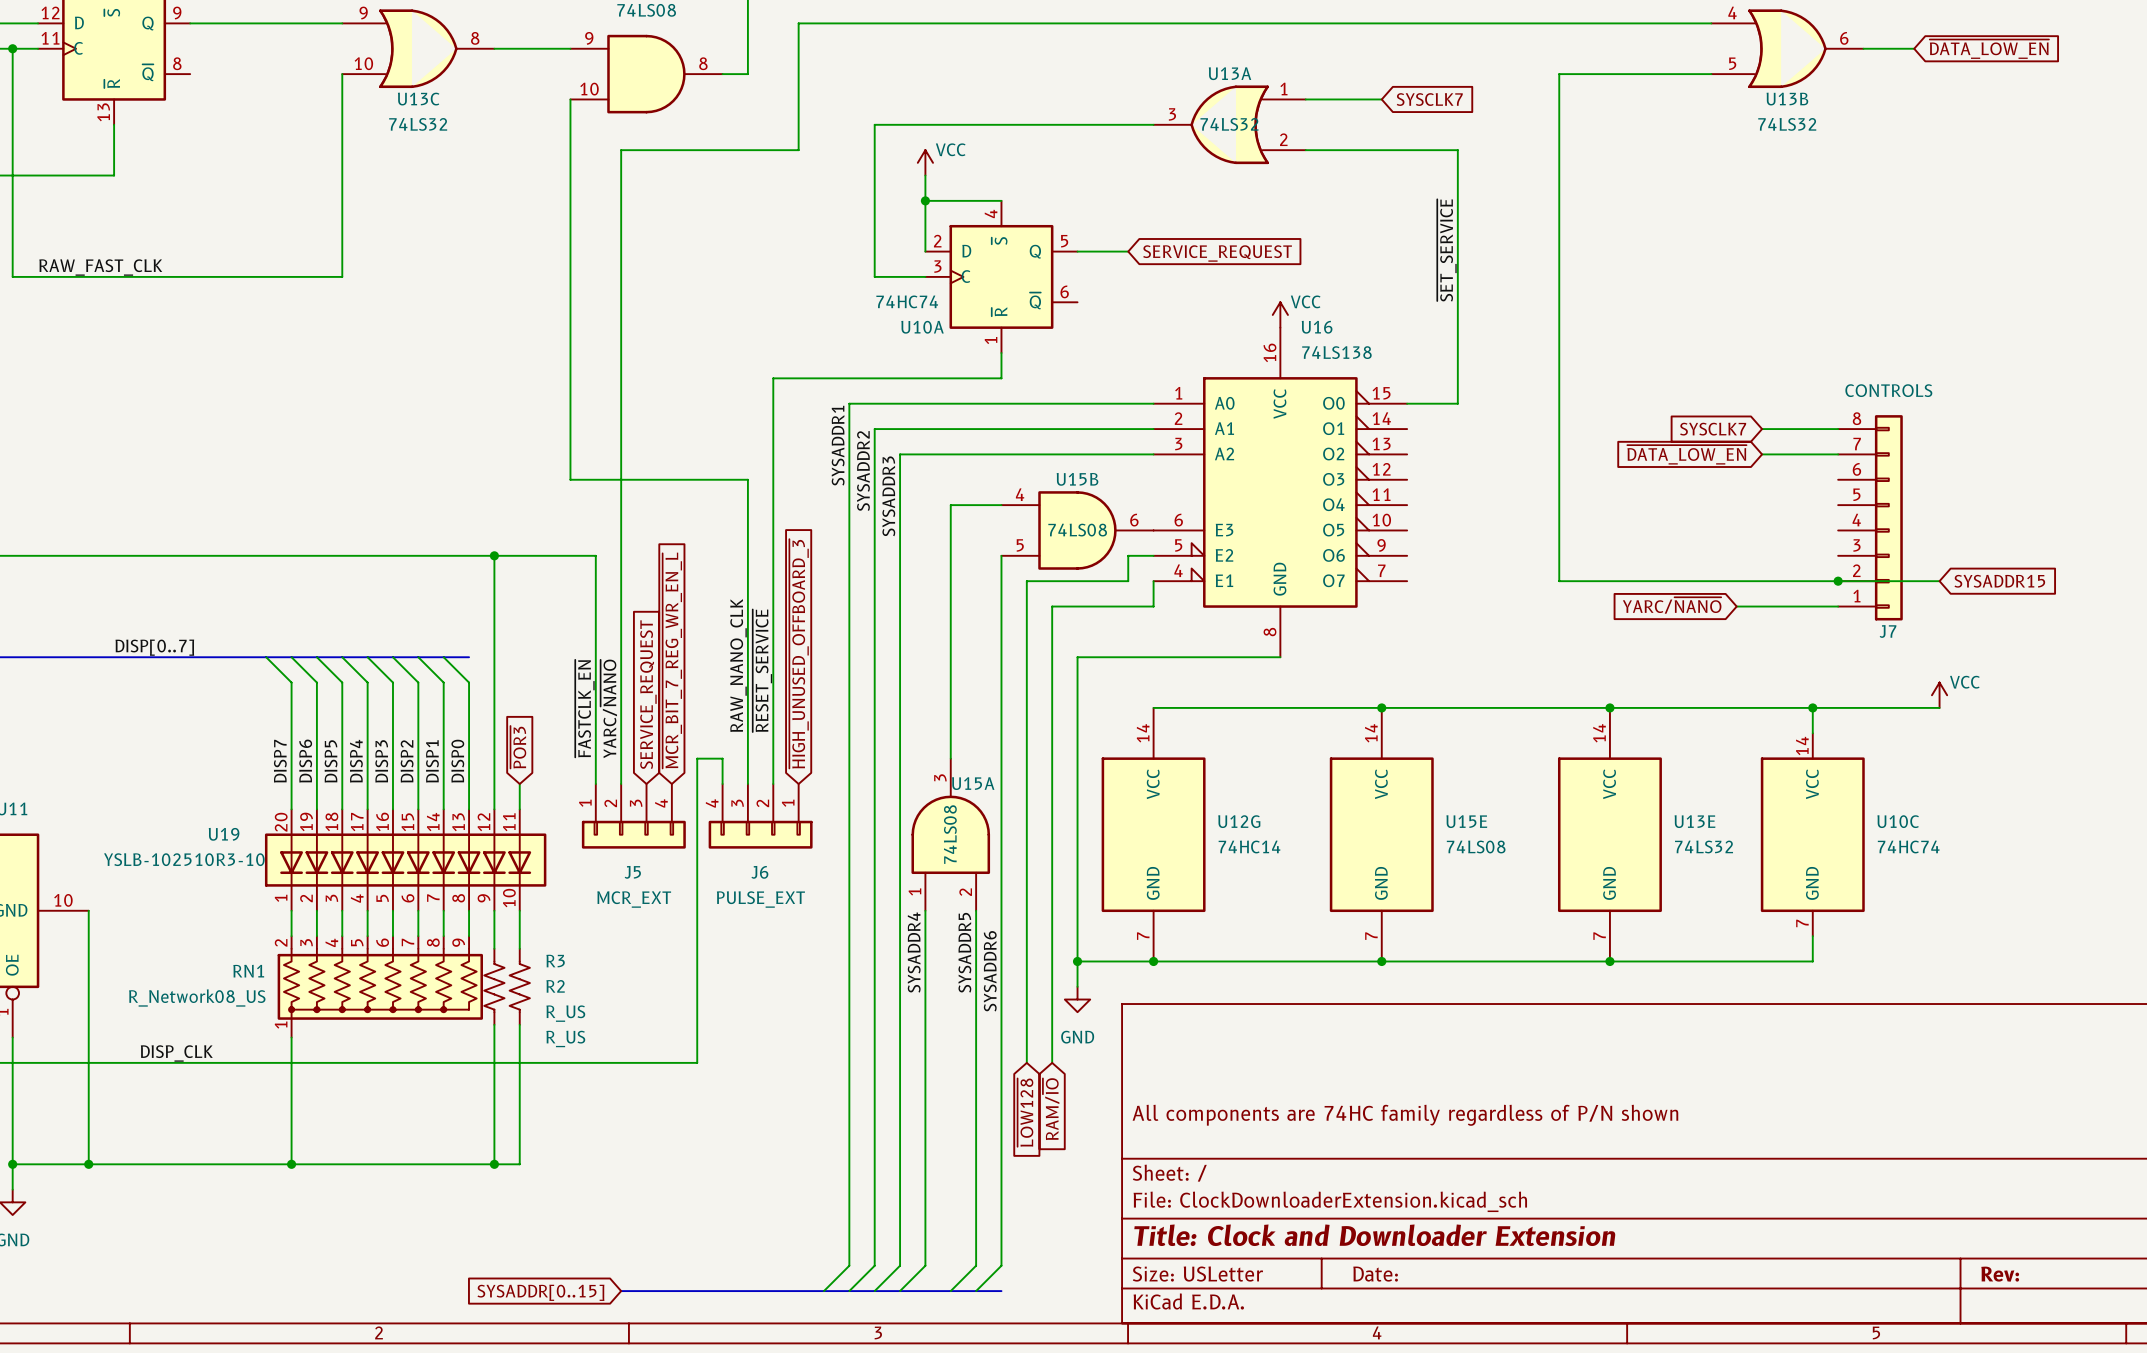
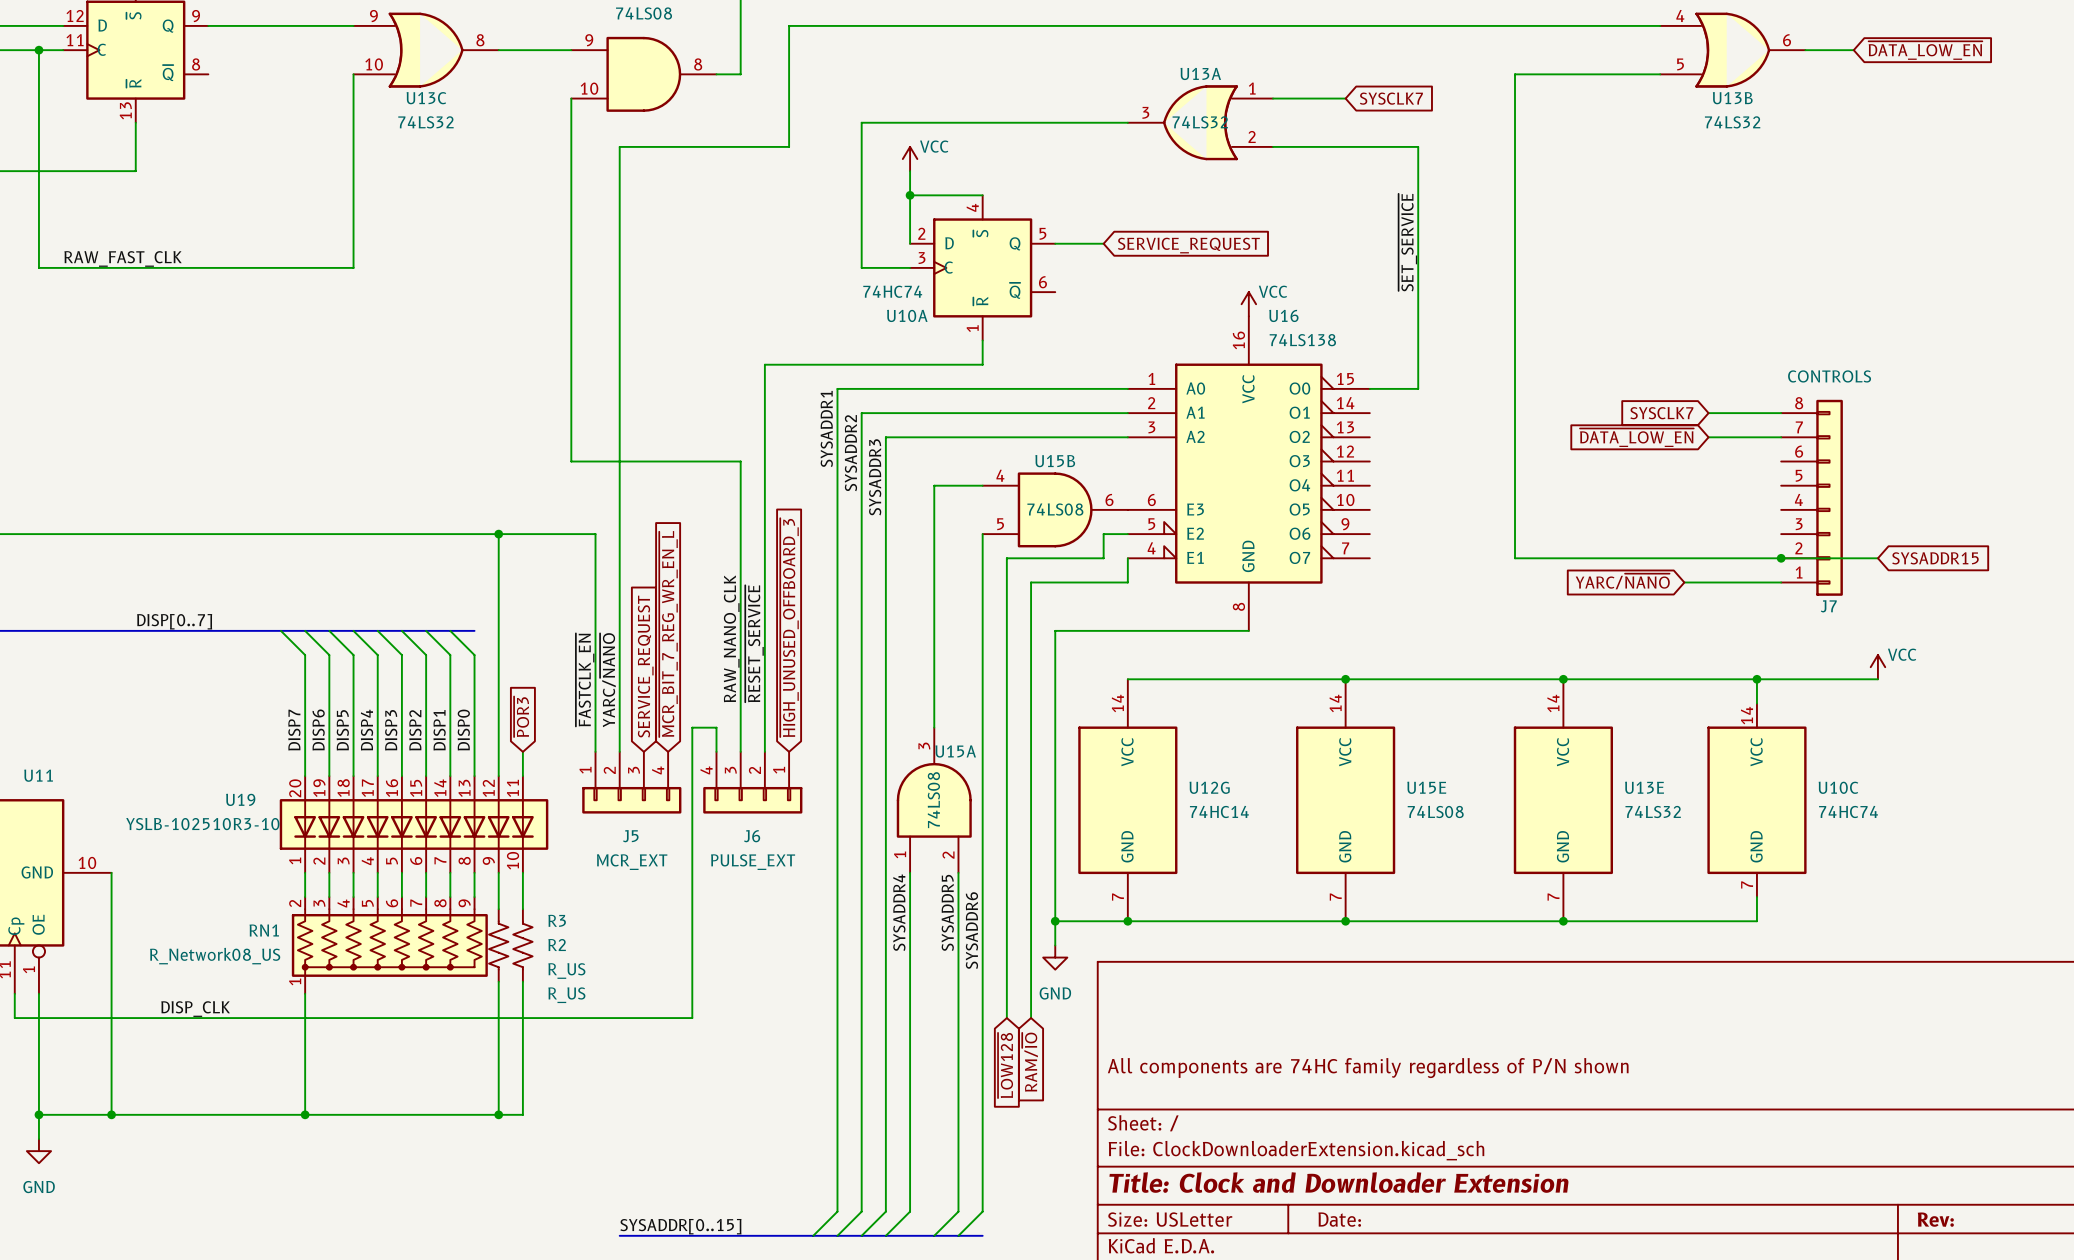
label: none -> SYSADDR[0..15] (680, 1226)
global label: SYSADDR[0..15] (540, 1292) -> none

